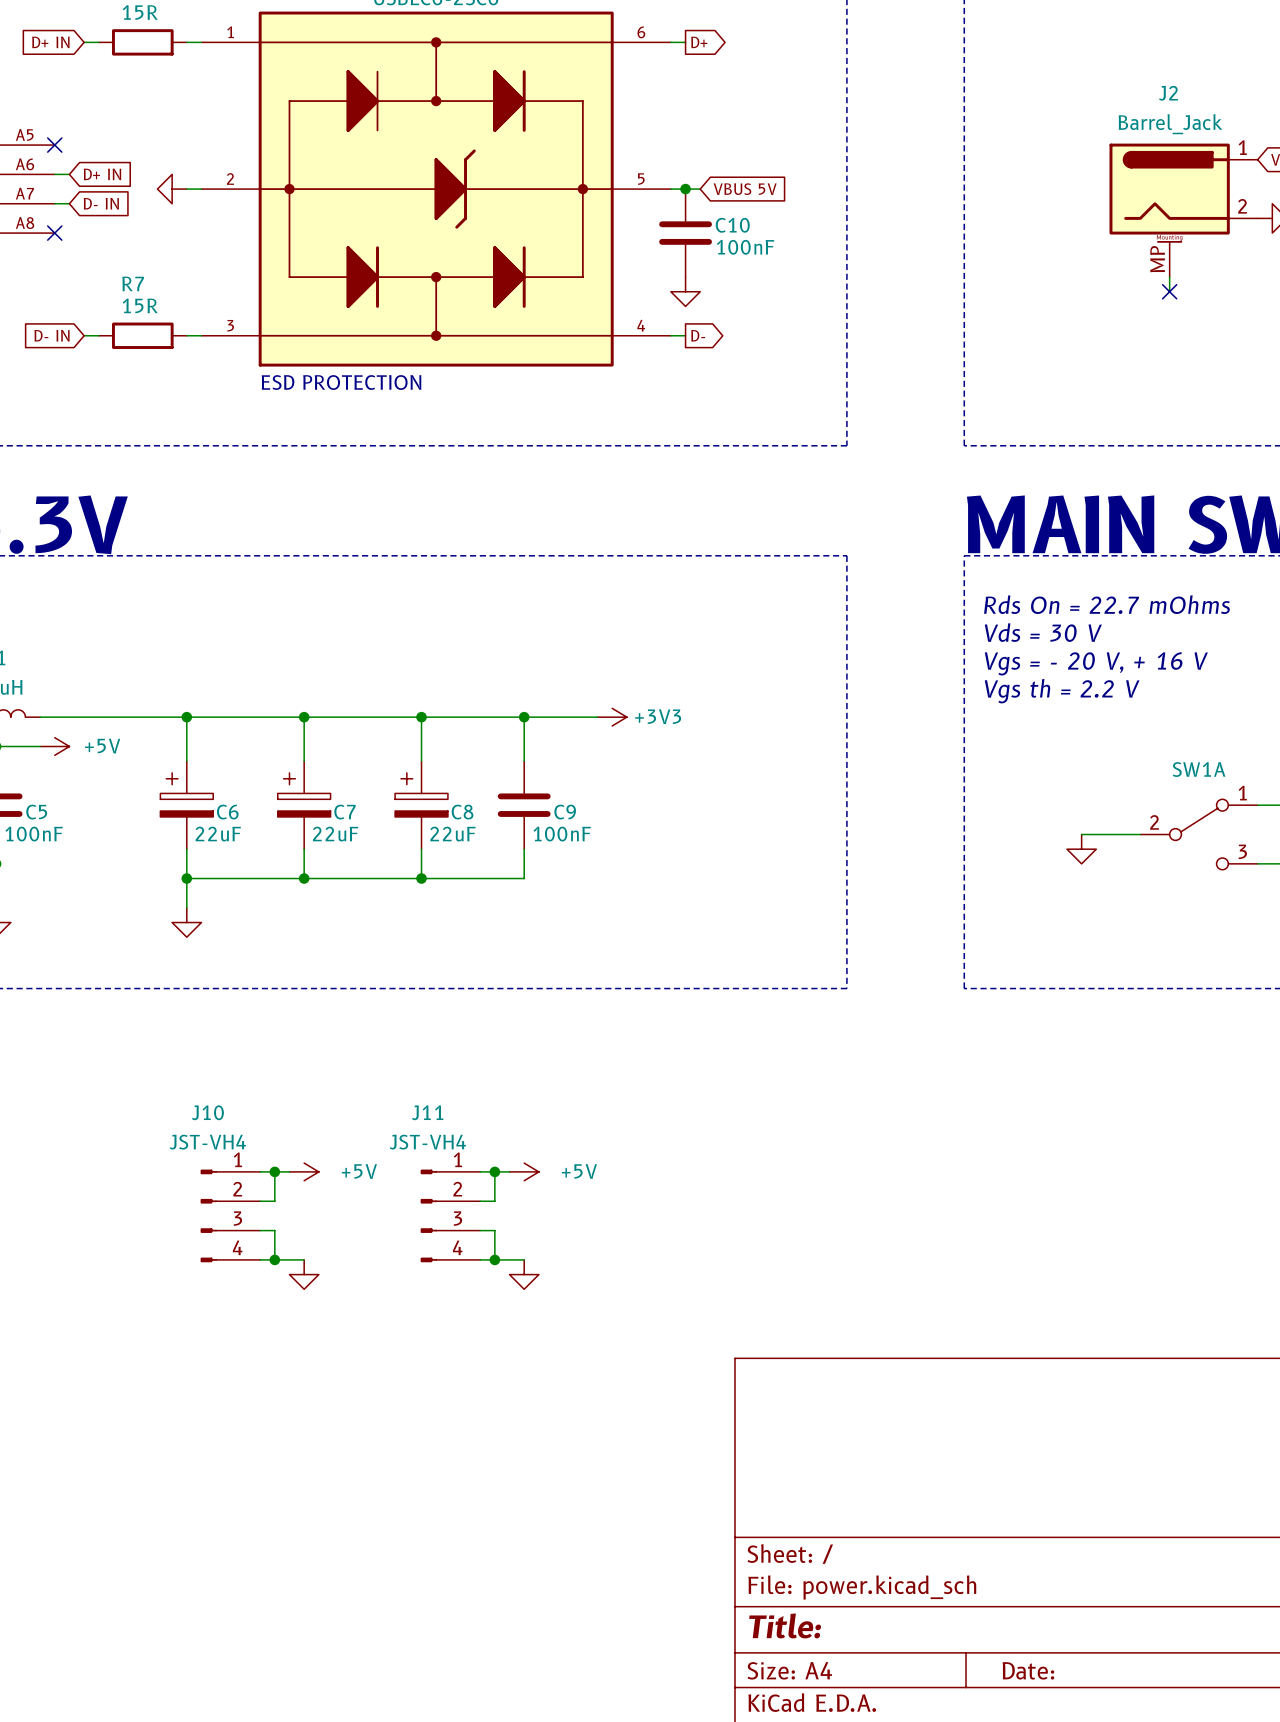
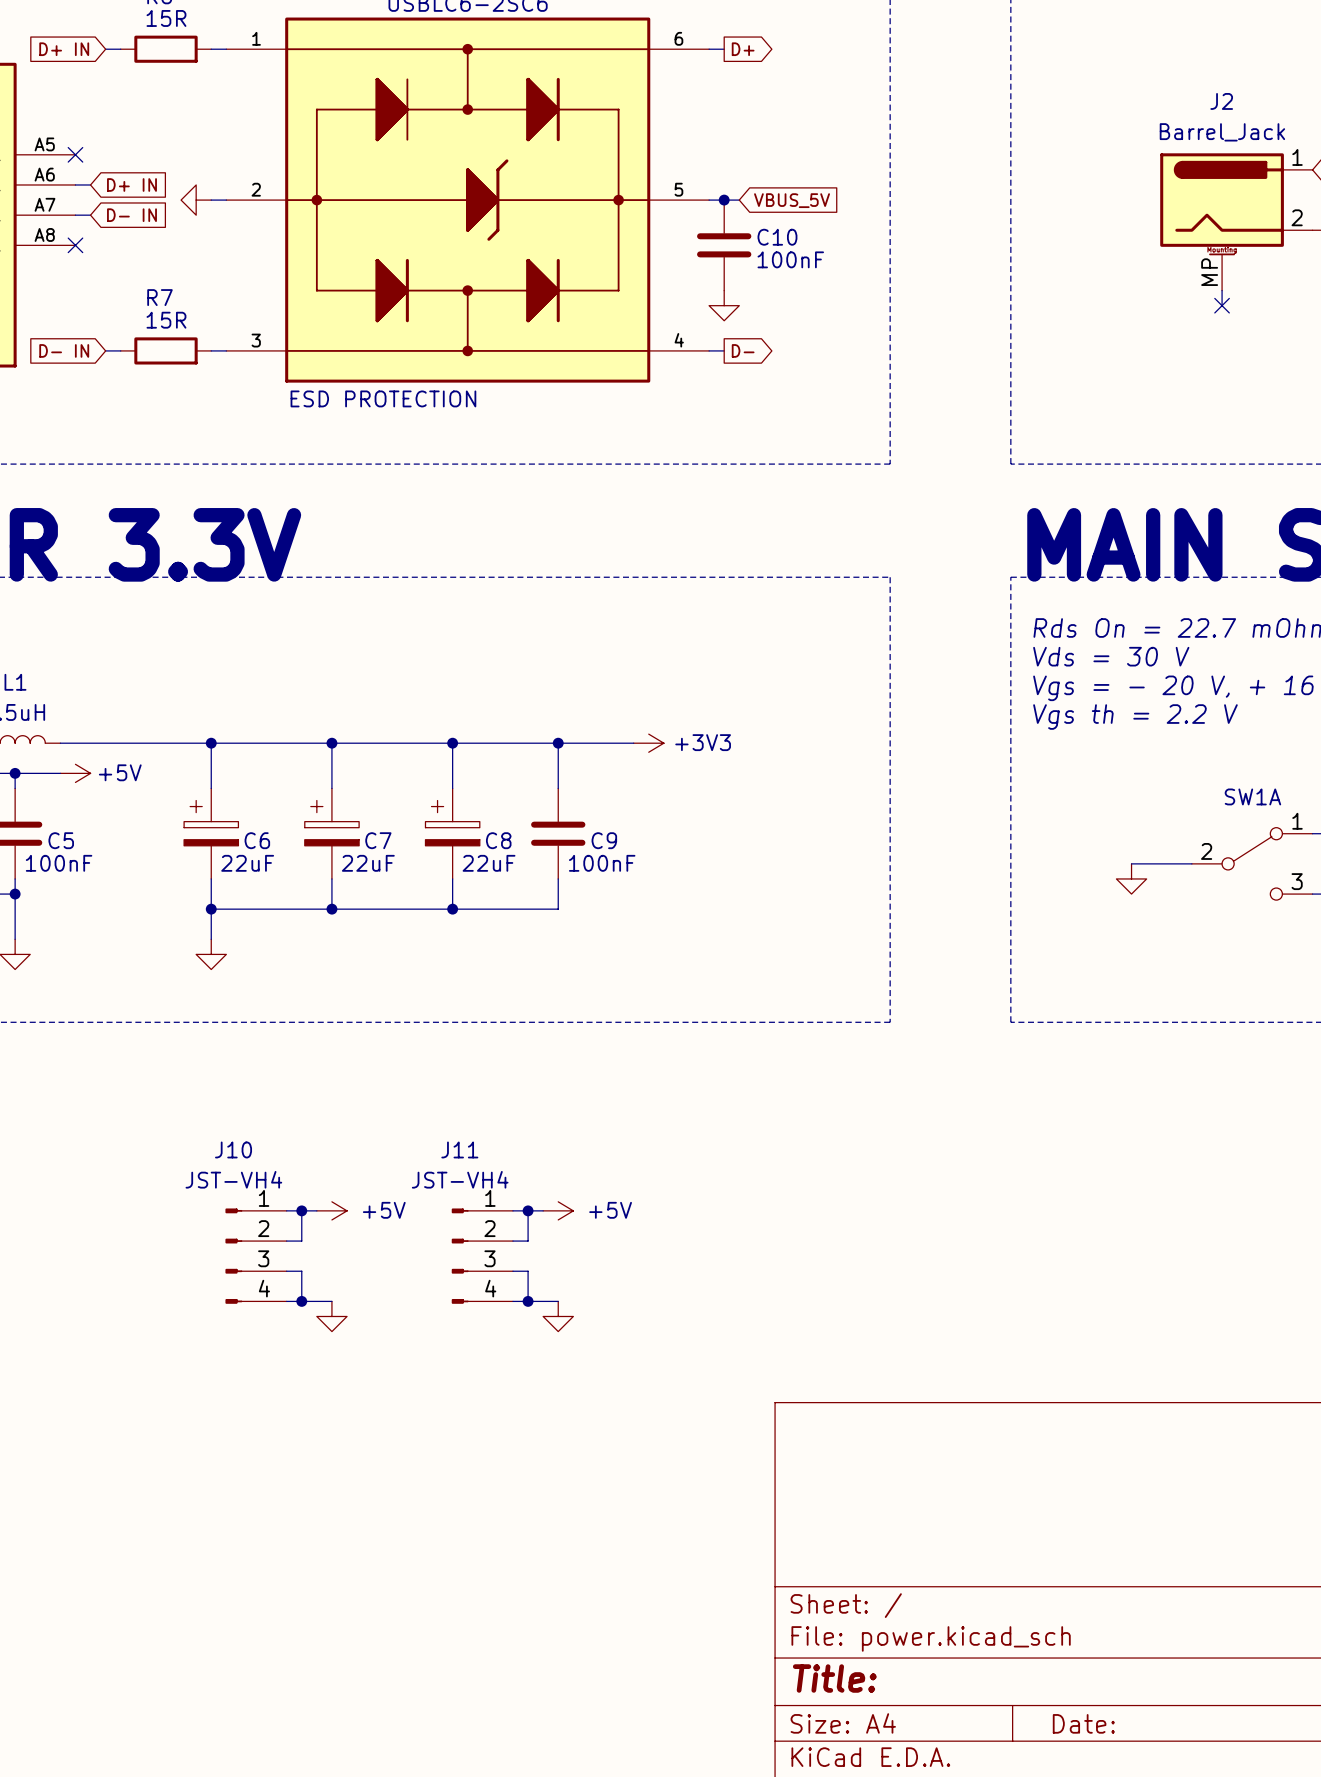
global label: VBUS 5V (745, 189) -> VBUS_5V (792, 200)

